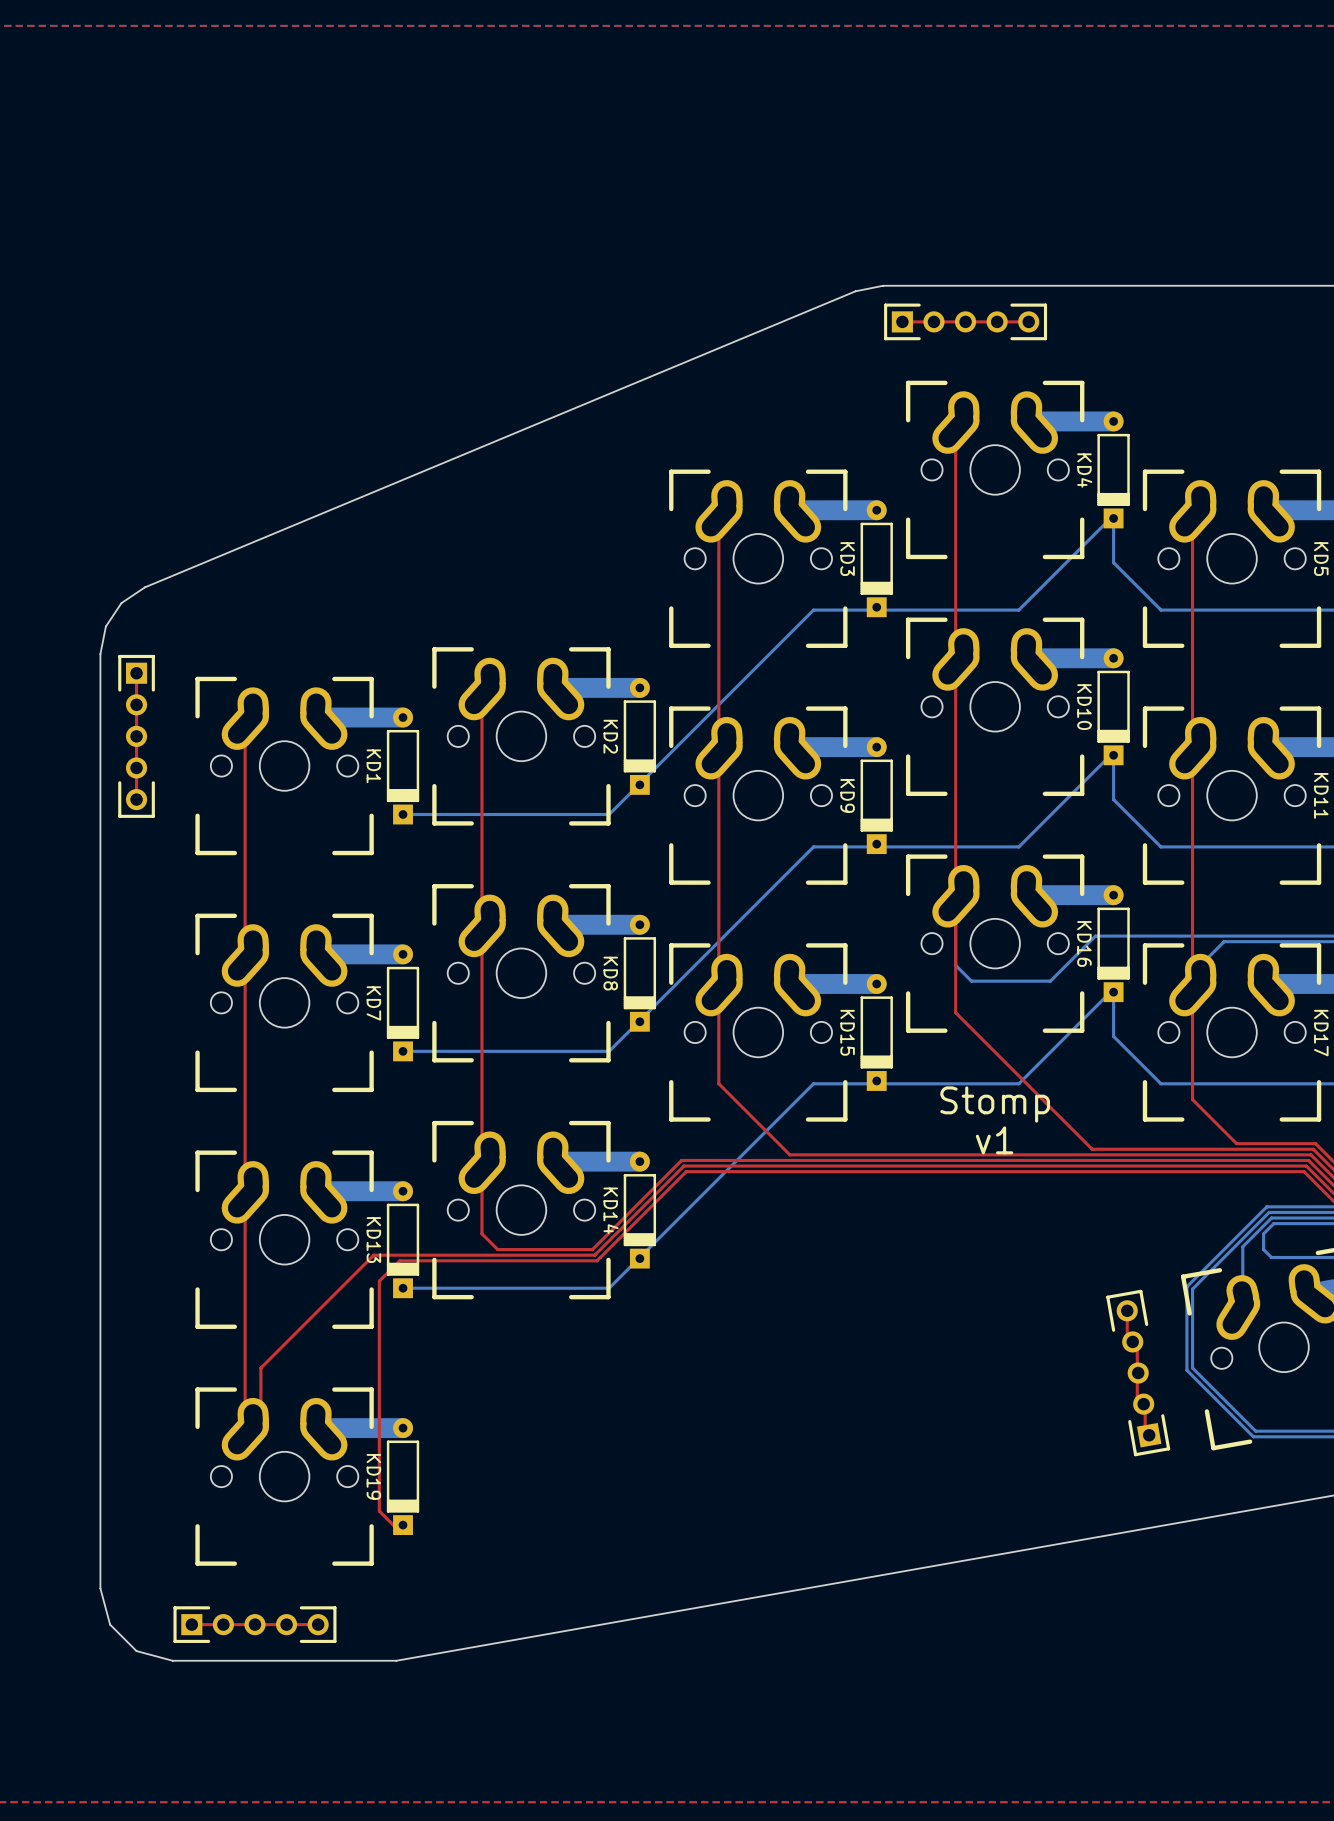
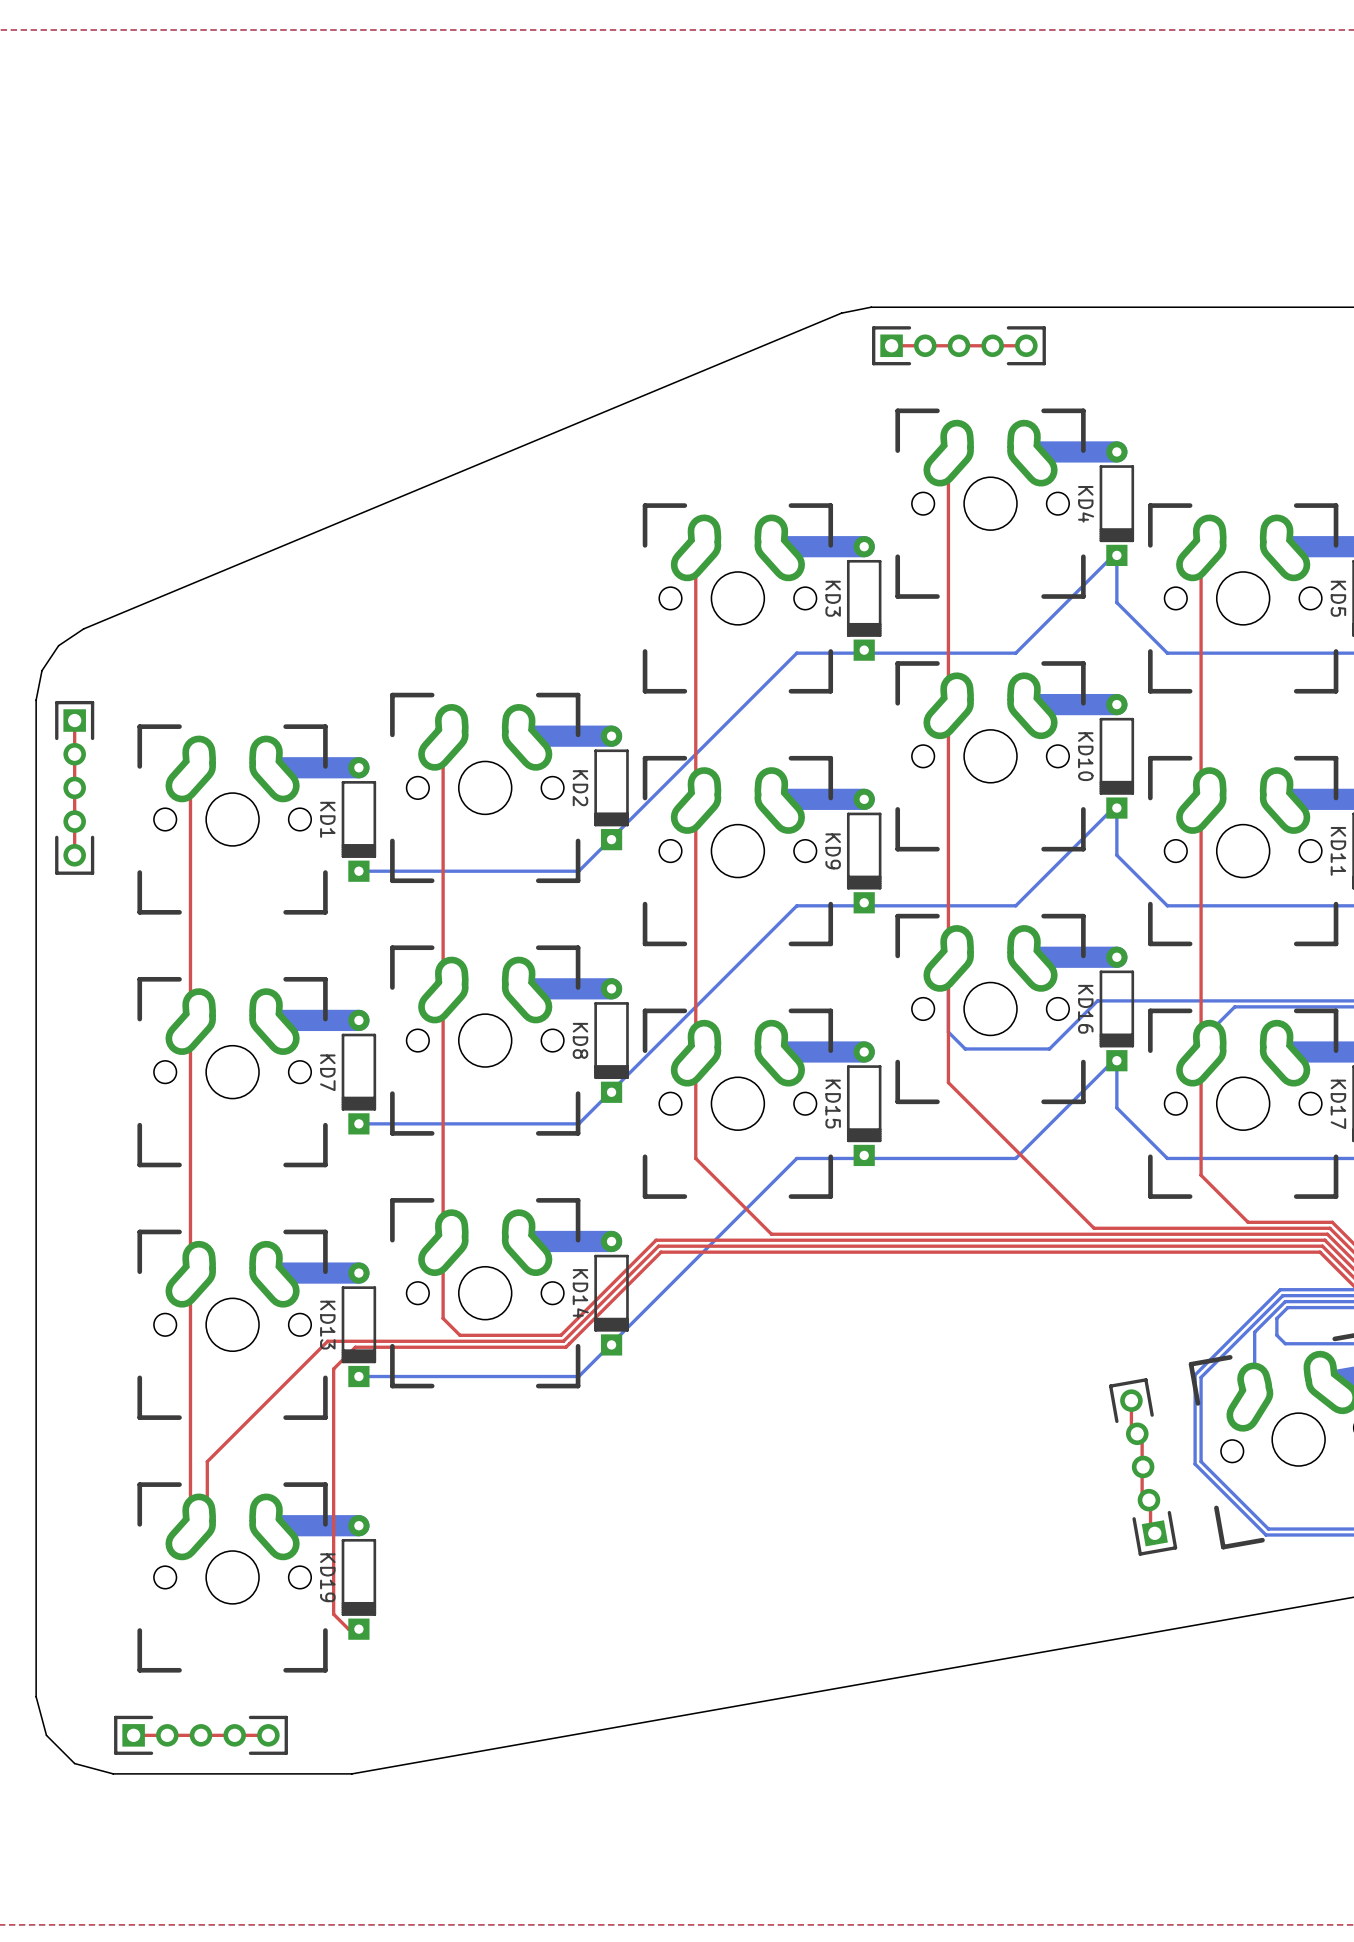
text: Stomp (995, 1104) -> none
text: v1 (994, 1140) -> none

